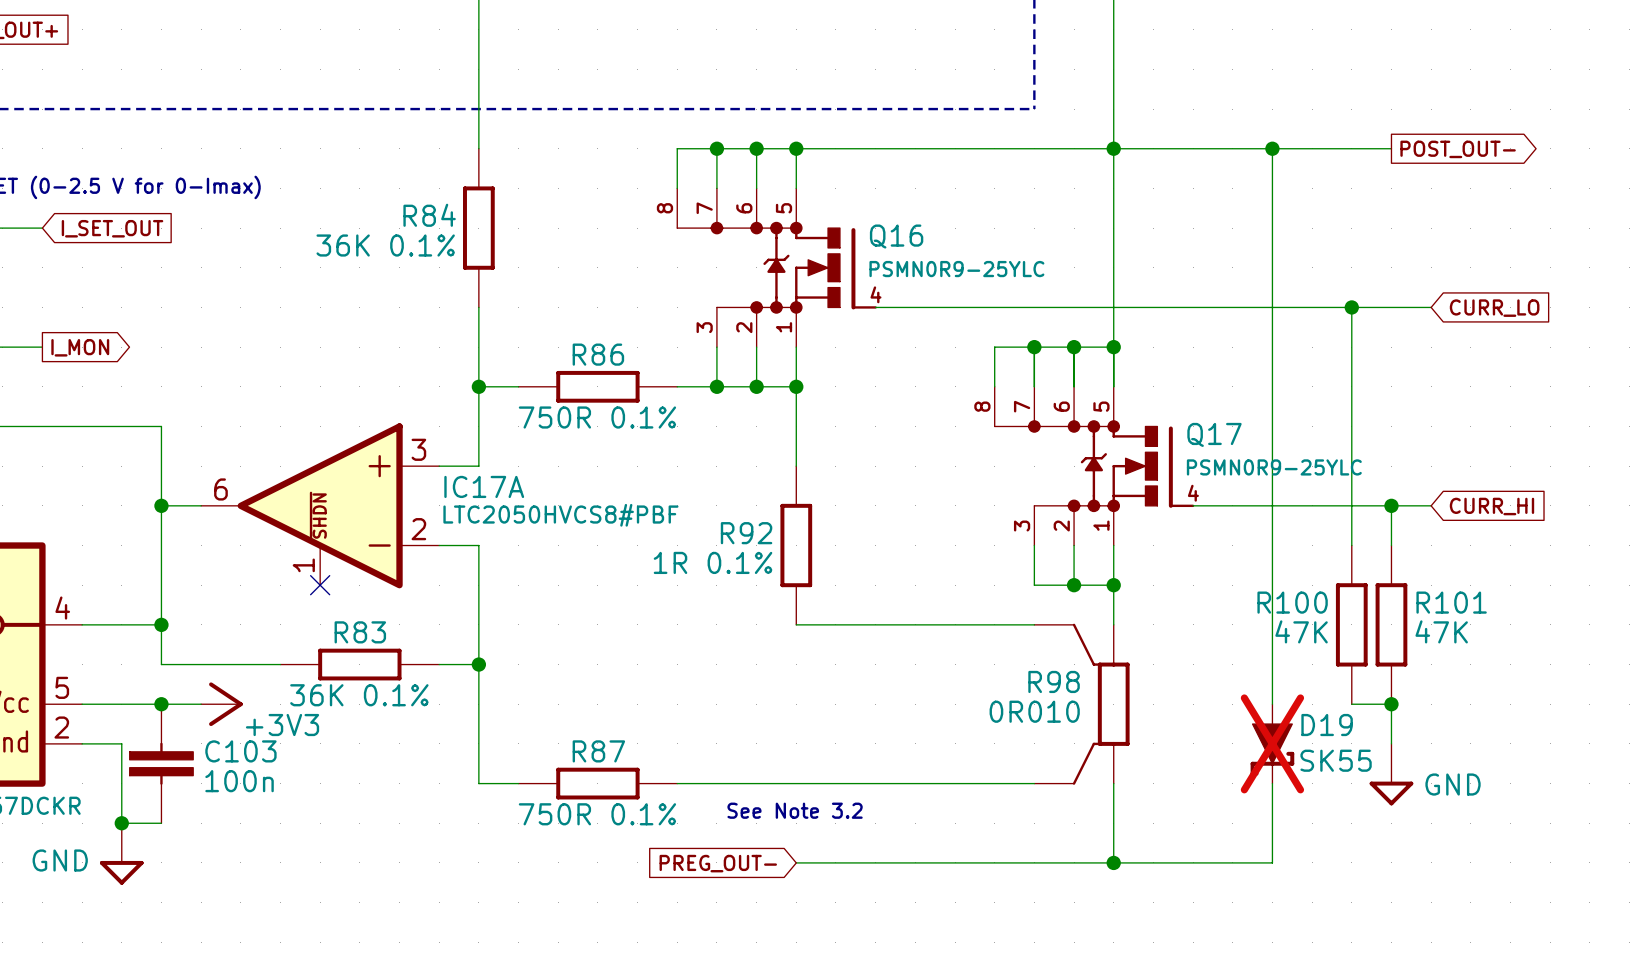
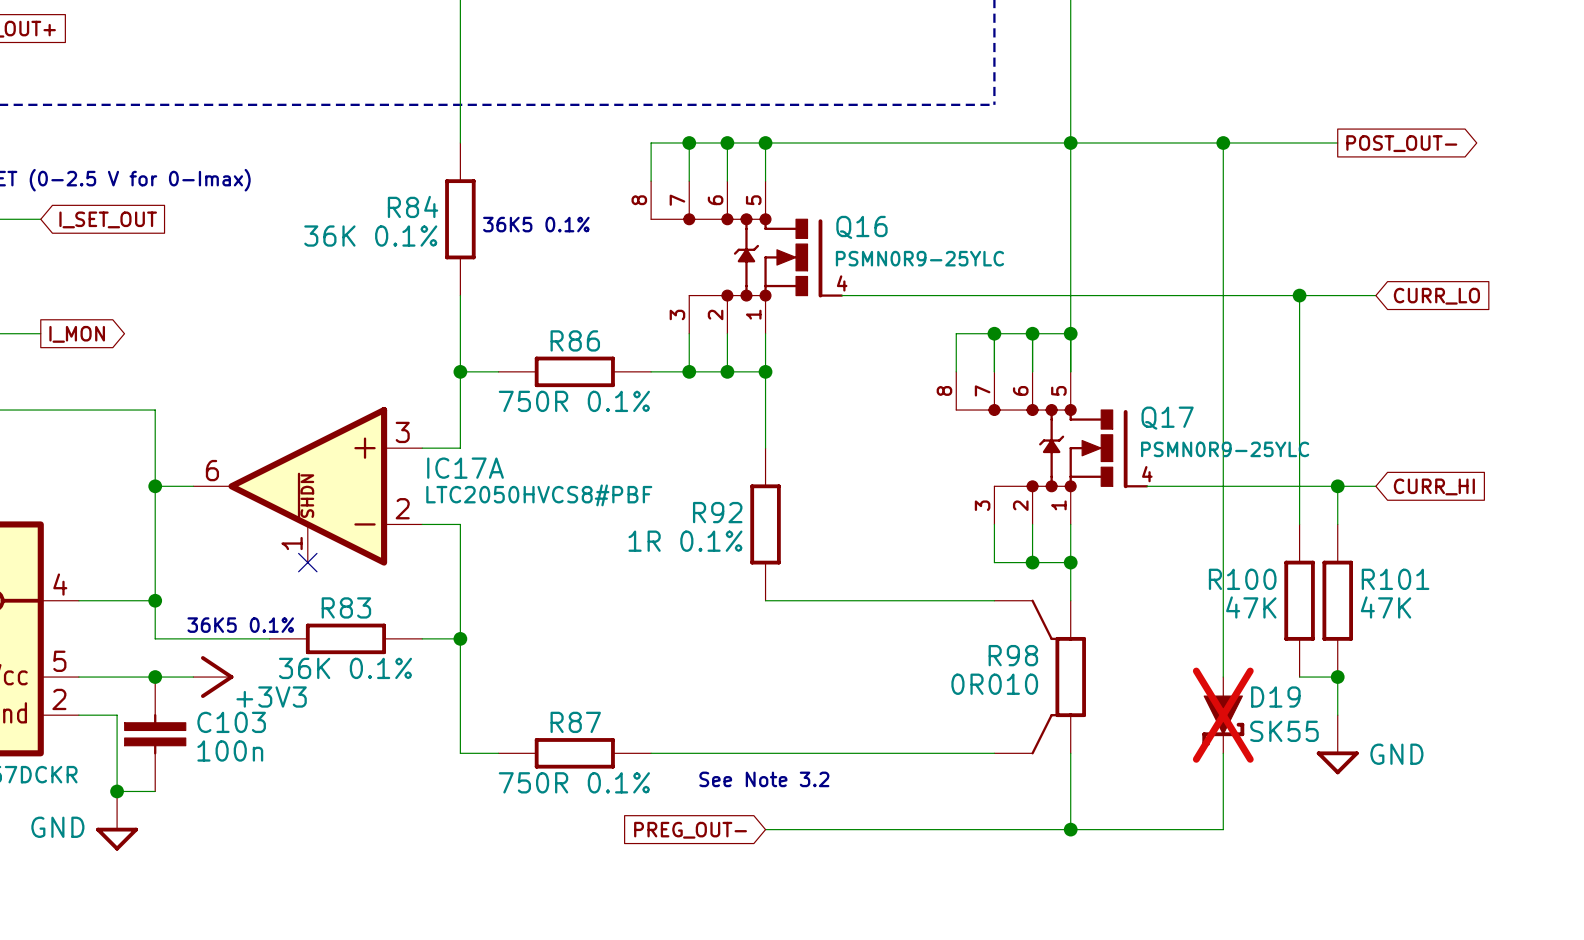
text: none -> 36K5 0.1% (536, 224)
text: none -> 36K5 0.1% (240, 625)

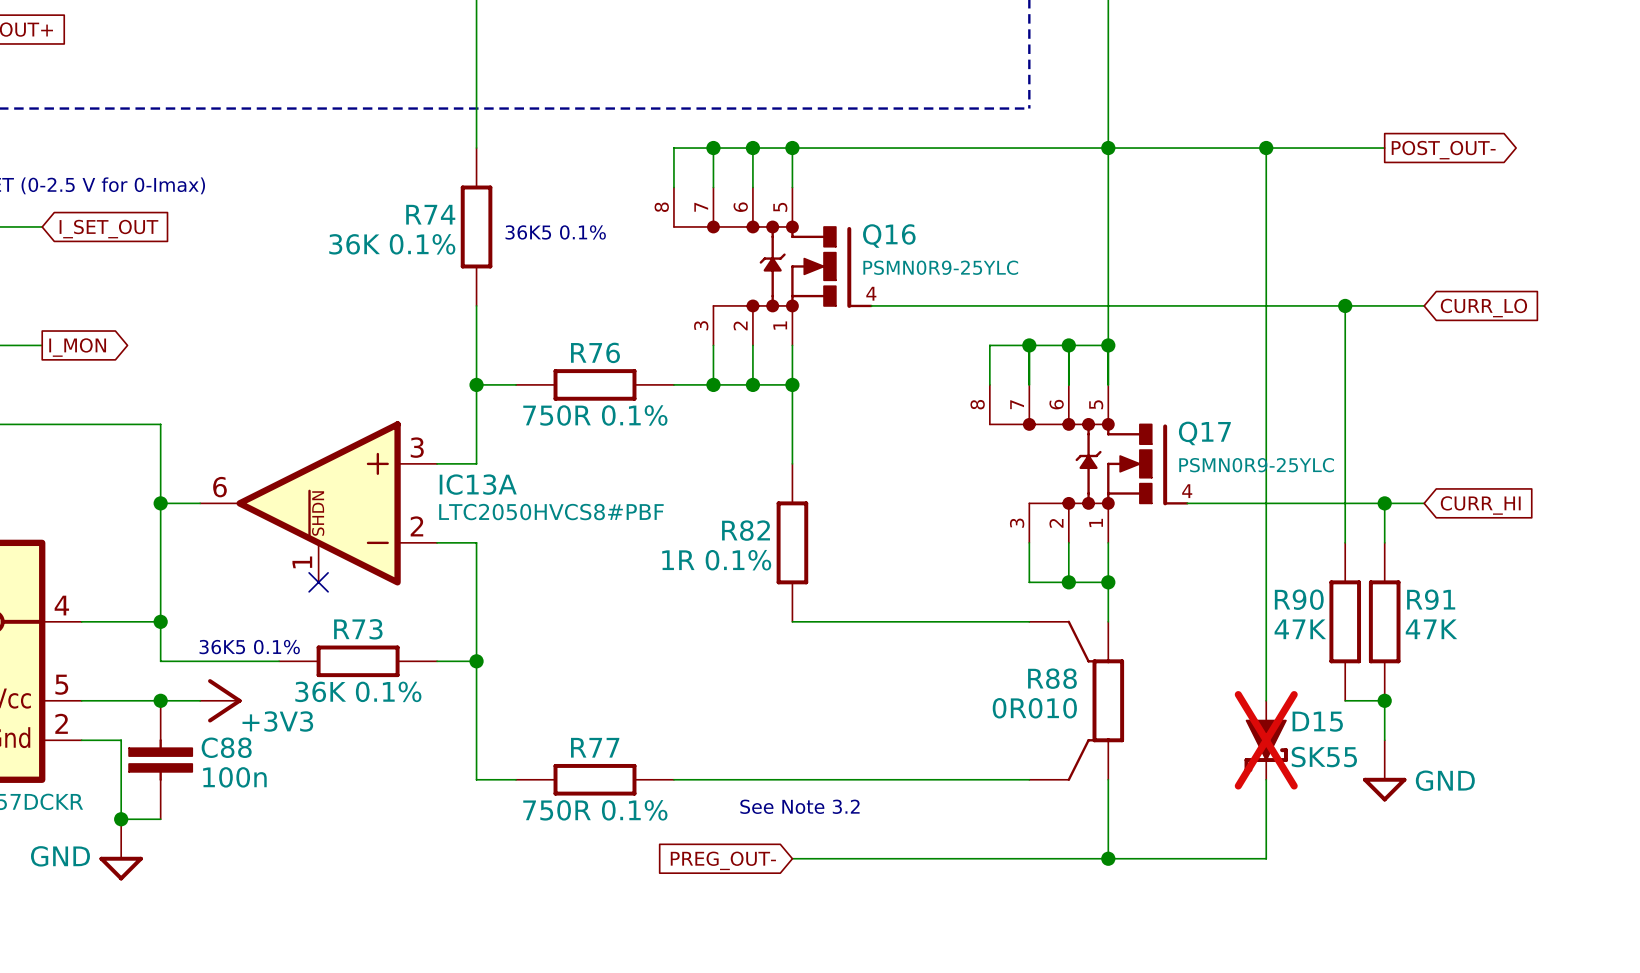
R84 name: R84 (413, 206) -> R74 (430, 214)
R86 name: R86 (575, 340) -> R76 (595, 352)
IC17A name: IC17A (465, 468) -> IC13A (478, 484)
R92 name: R92 (717, 512) -> R82 (746, 530)
R100 name: R100 (1242, 579) -> R90 (1299, 599)
R101 name: R101 (1395, 579) -> R91 (1431, 599)
R83 name: R83 (346, 607) -> R73 (358, 629)
R98 name: R98 (1013, 655) -> R88 (1052, 678)
D19 name: D19 (1275, 697) -> D15 (1317, 721)
C103 name: C103 (231, 722) -> C88 (226, 747)
R87 name: R87 (575, 722) -> R77 (595, 747)

